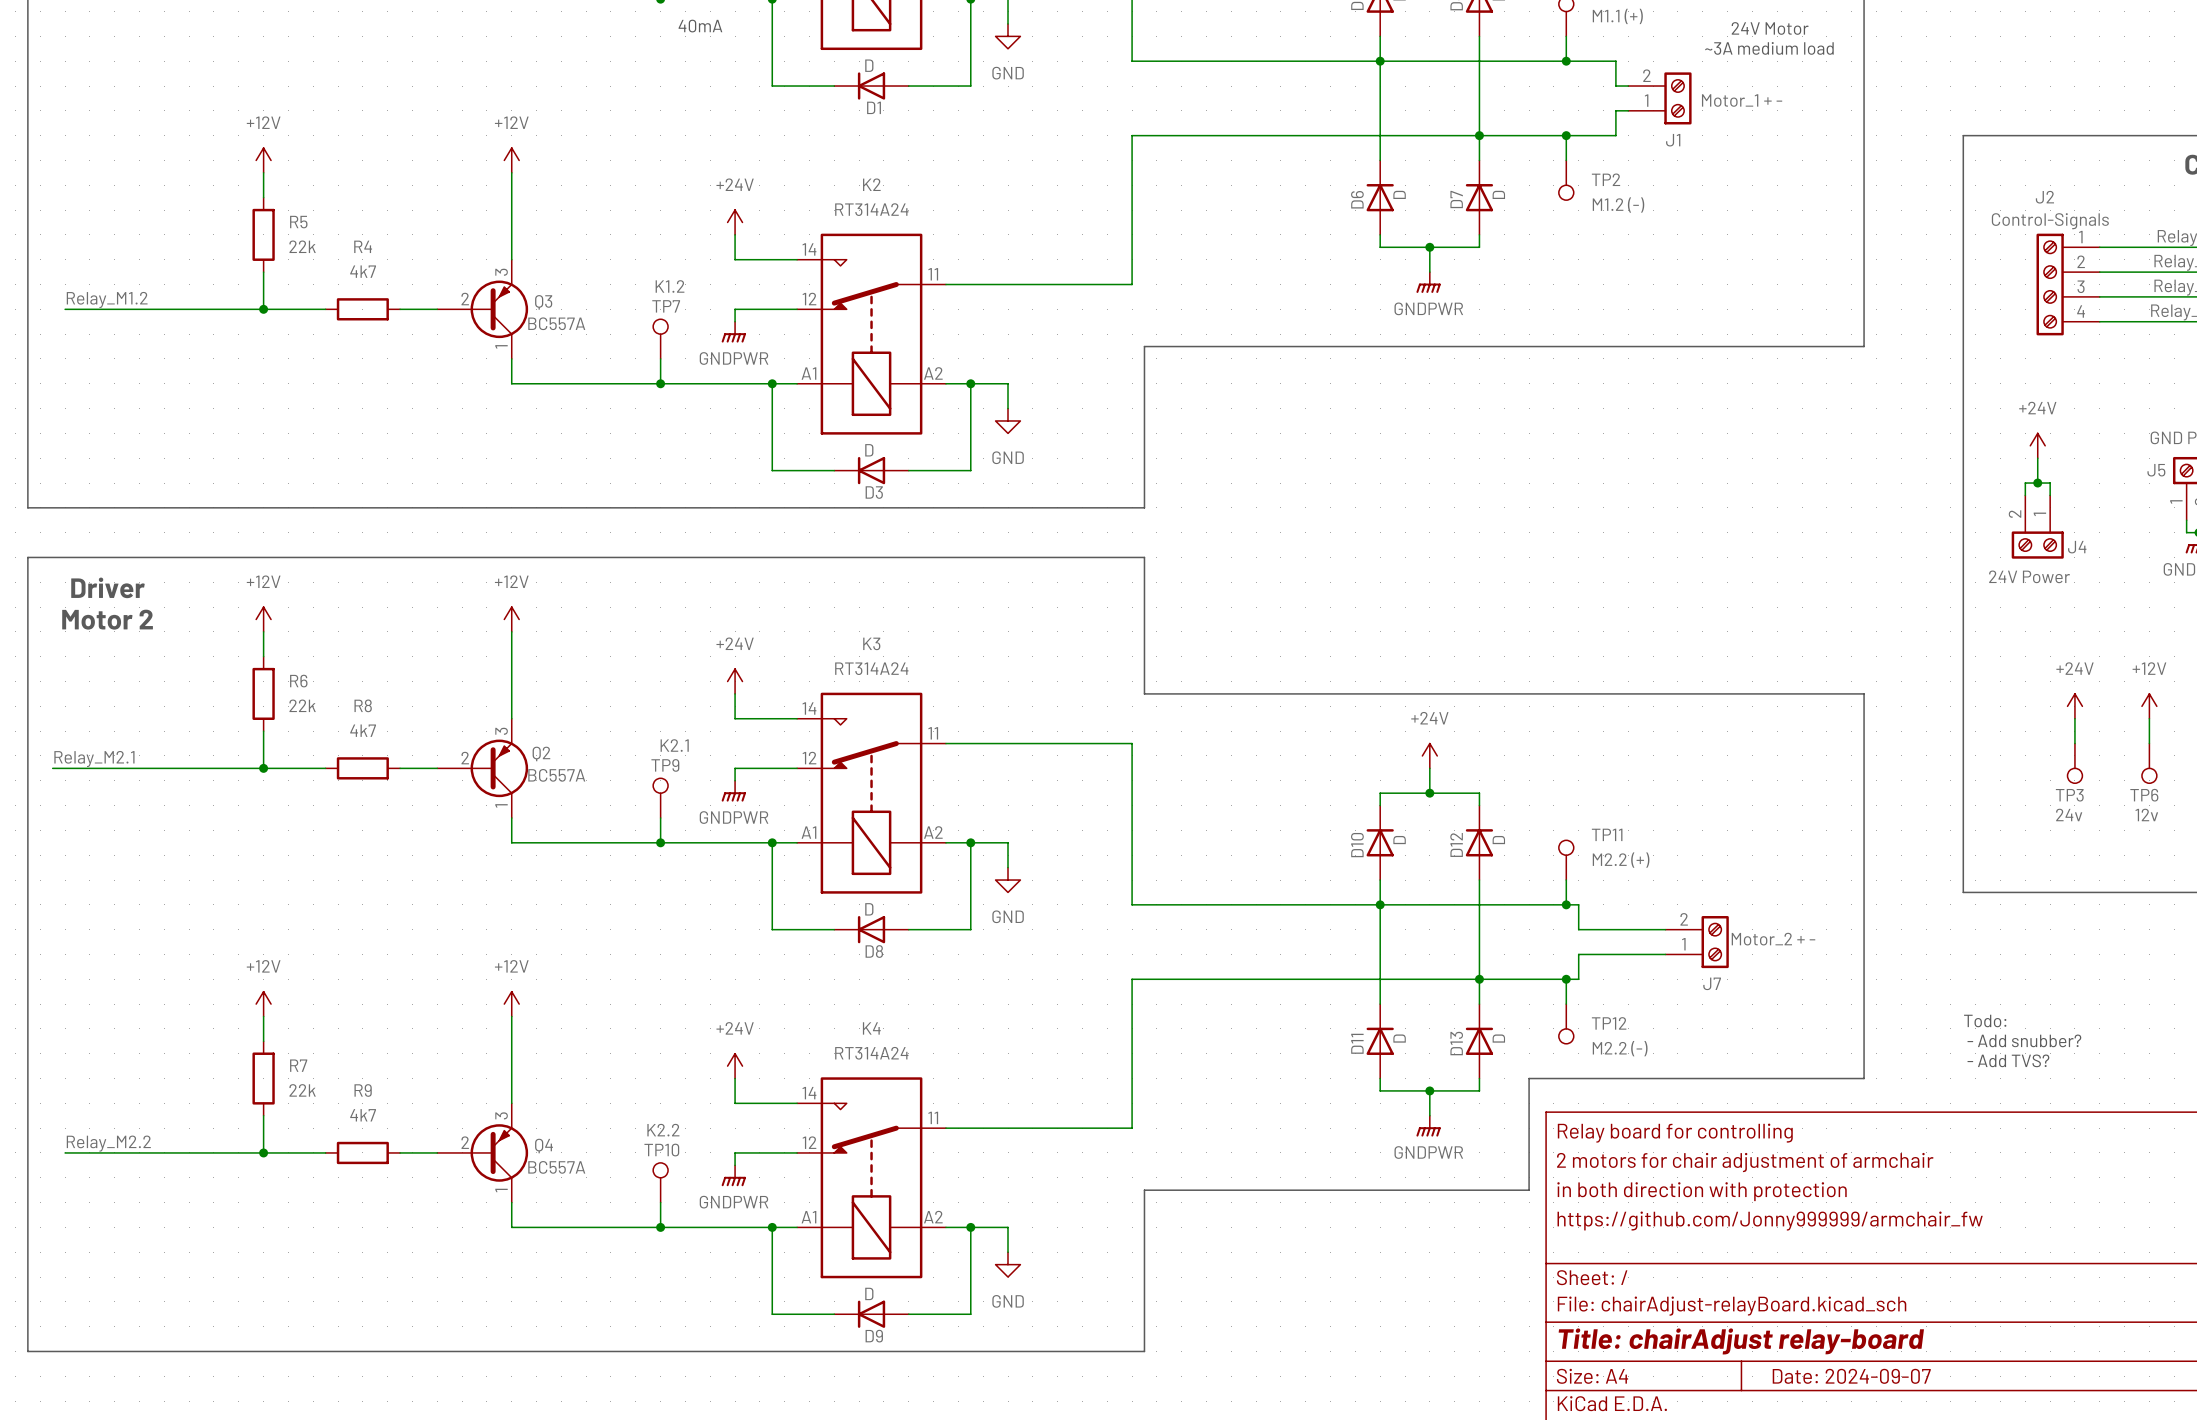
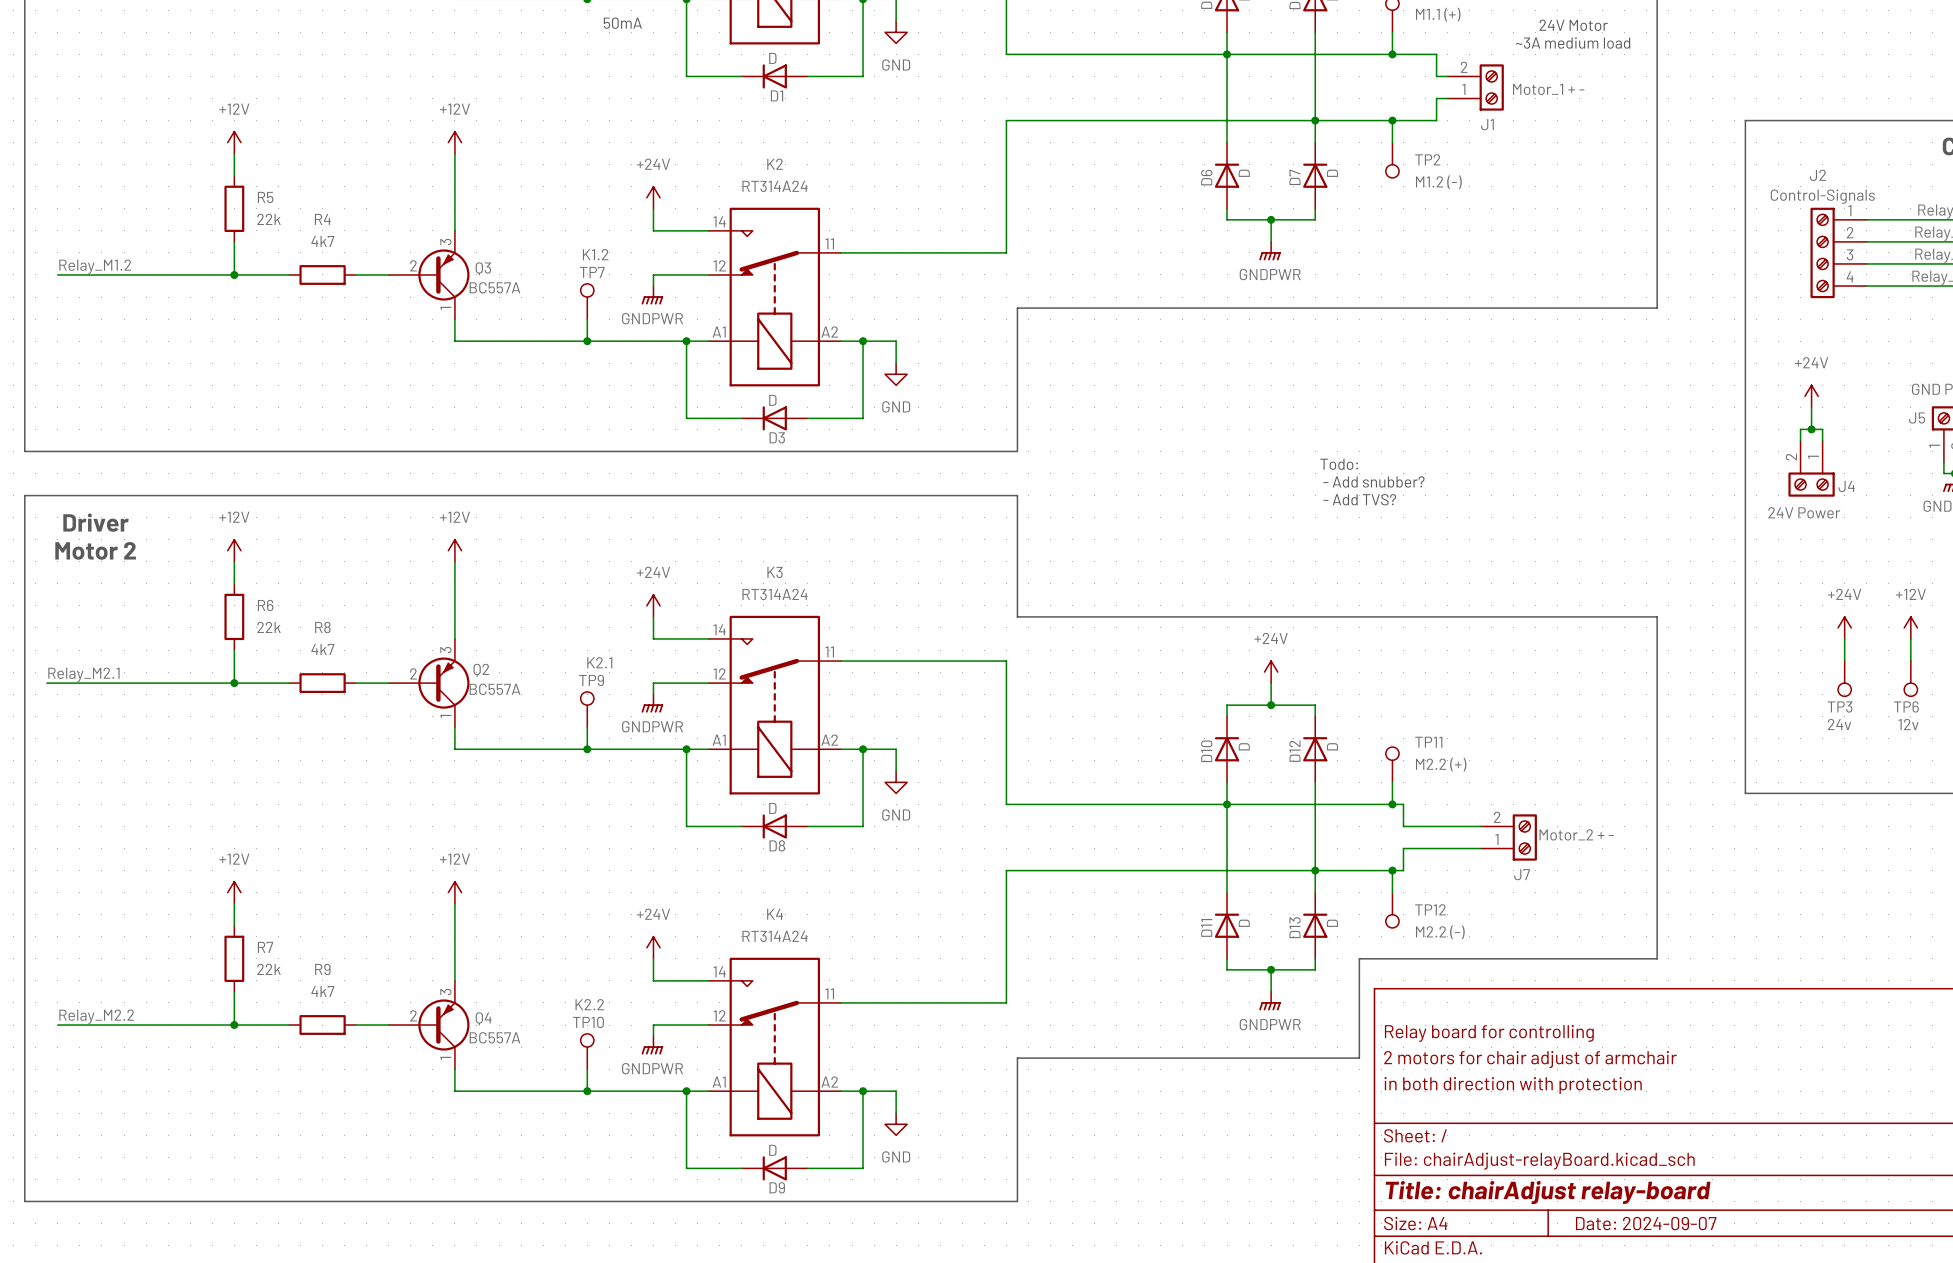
text: 40mA (700, 26) -> 50mA (622, 23)
text: none -> Todo: (1339, 464)
text: none -> - Add snubber? (1373, 481)
text: none -> - Add TVS? (1359, 499)
text: Todo: (1985, 1020) -> none
text: - Add snubber? (2024, 1040) -> none
text: - Add TVS? (2008, 1060) -> none
title block: Relay board for controlling (1675, 1133) -> none
title block: 2 motors for chair adjustment of armchair (1745, 1162) -> Relay board for controlling (1489, 1033)
title block: in both direction with protection (1702, 1191) -> 2 motors for chair adjust of armchair (1530, 1059)
title block: https://github.com/Jonny999999/armchair_fw (1770, 1221) -> in both direction with protection (1513, 1085)

